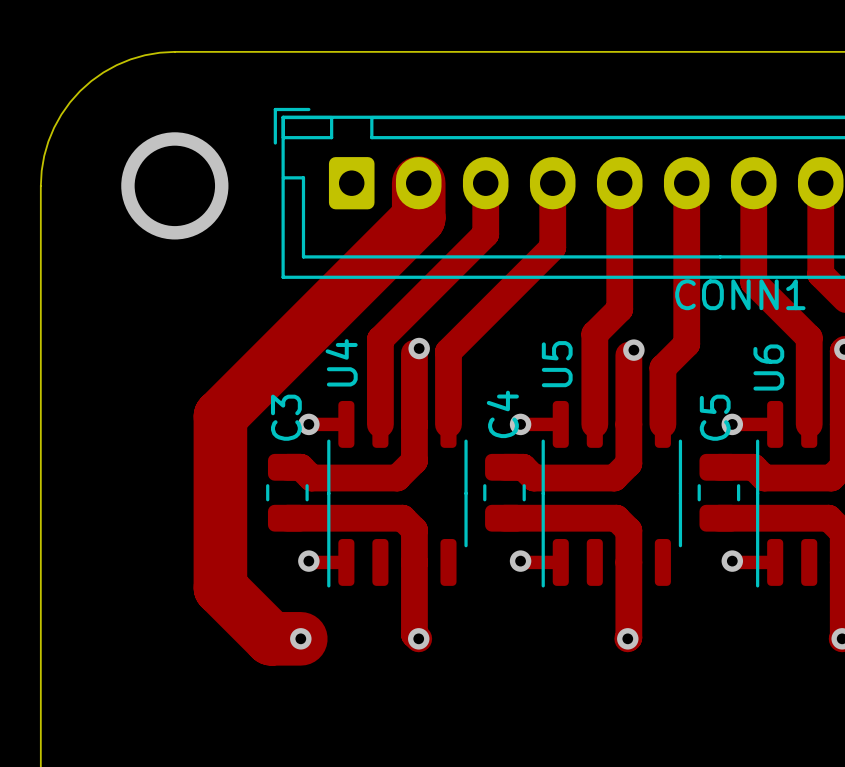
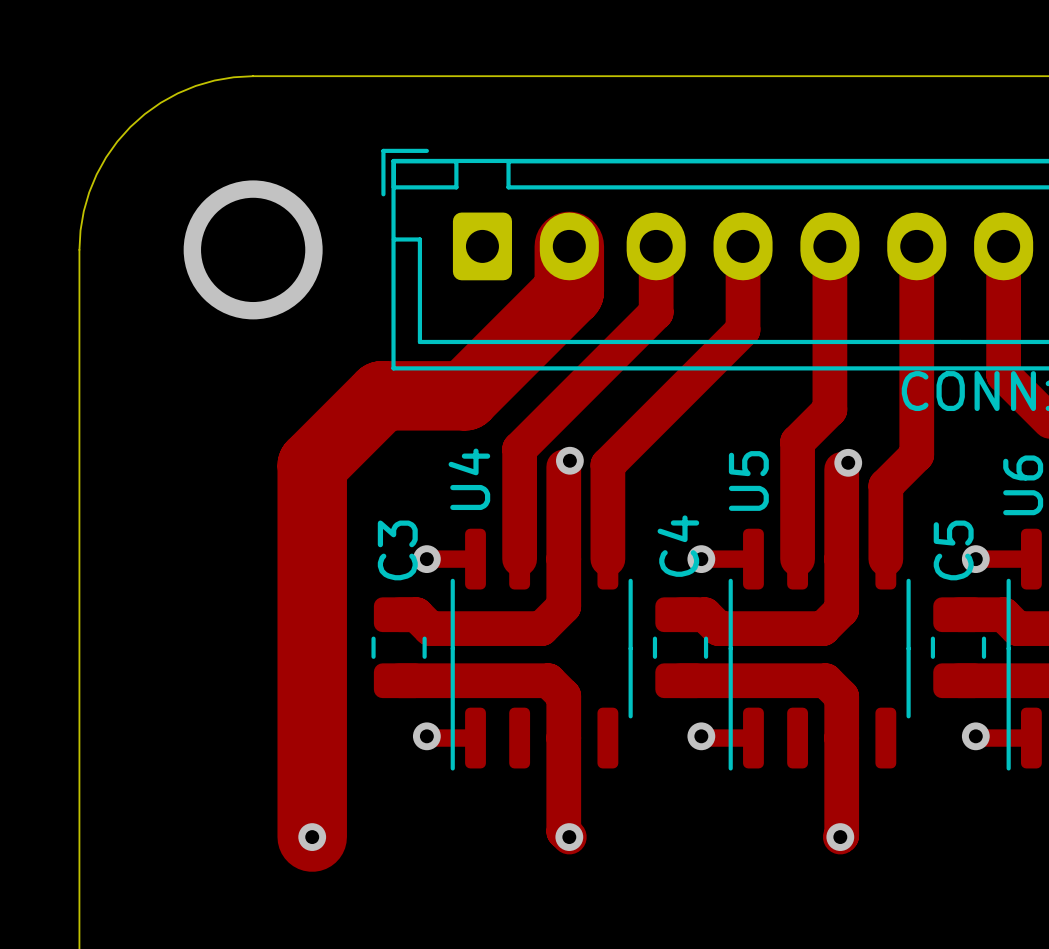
track: (338, 298) (220, 416) -> (465, 395) (381, 395) (312, 465) (312, 548)
track: (220, 587) (271, 638) (300, 638) -> (312, 771) (312, 837)
via position: (300, 638) -> (312, 837)

